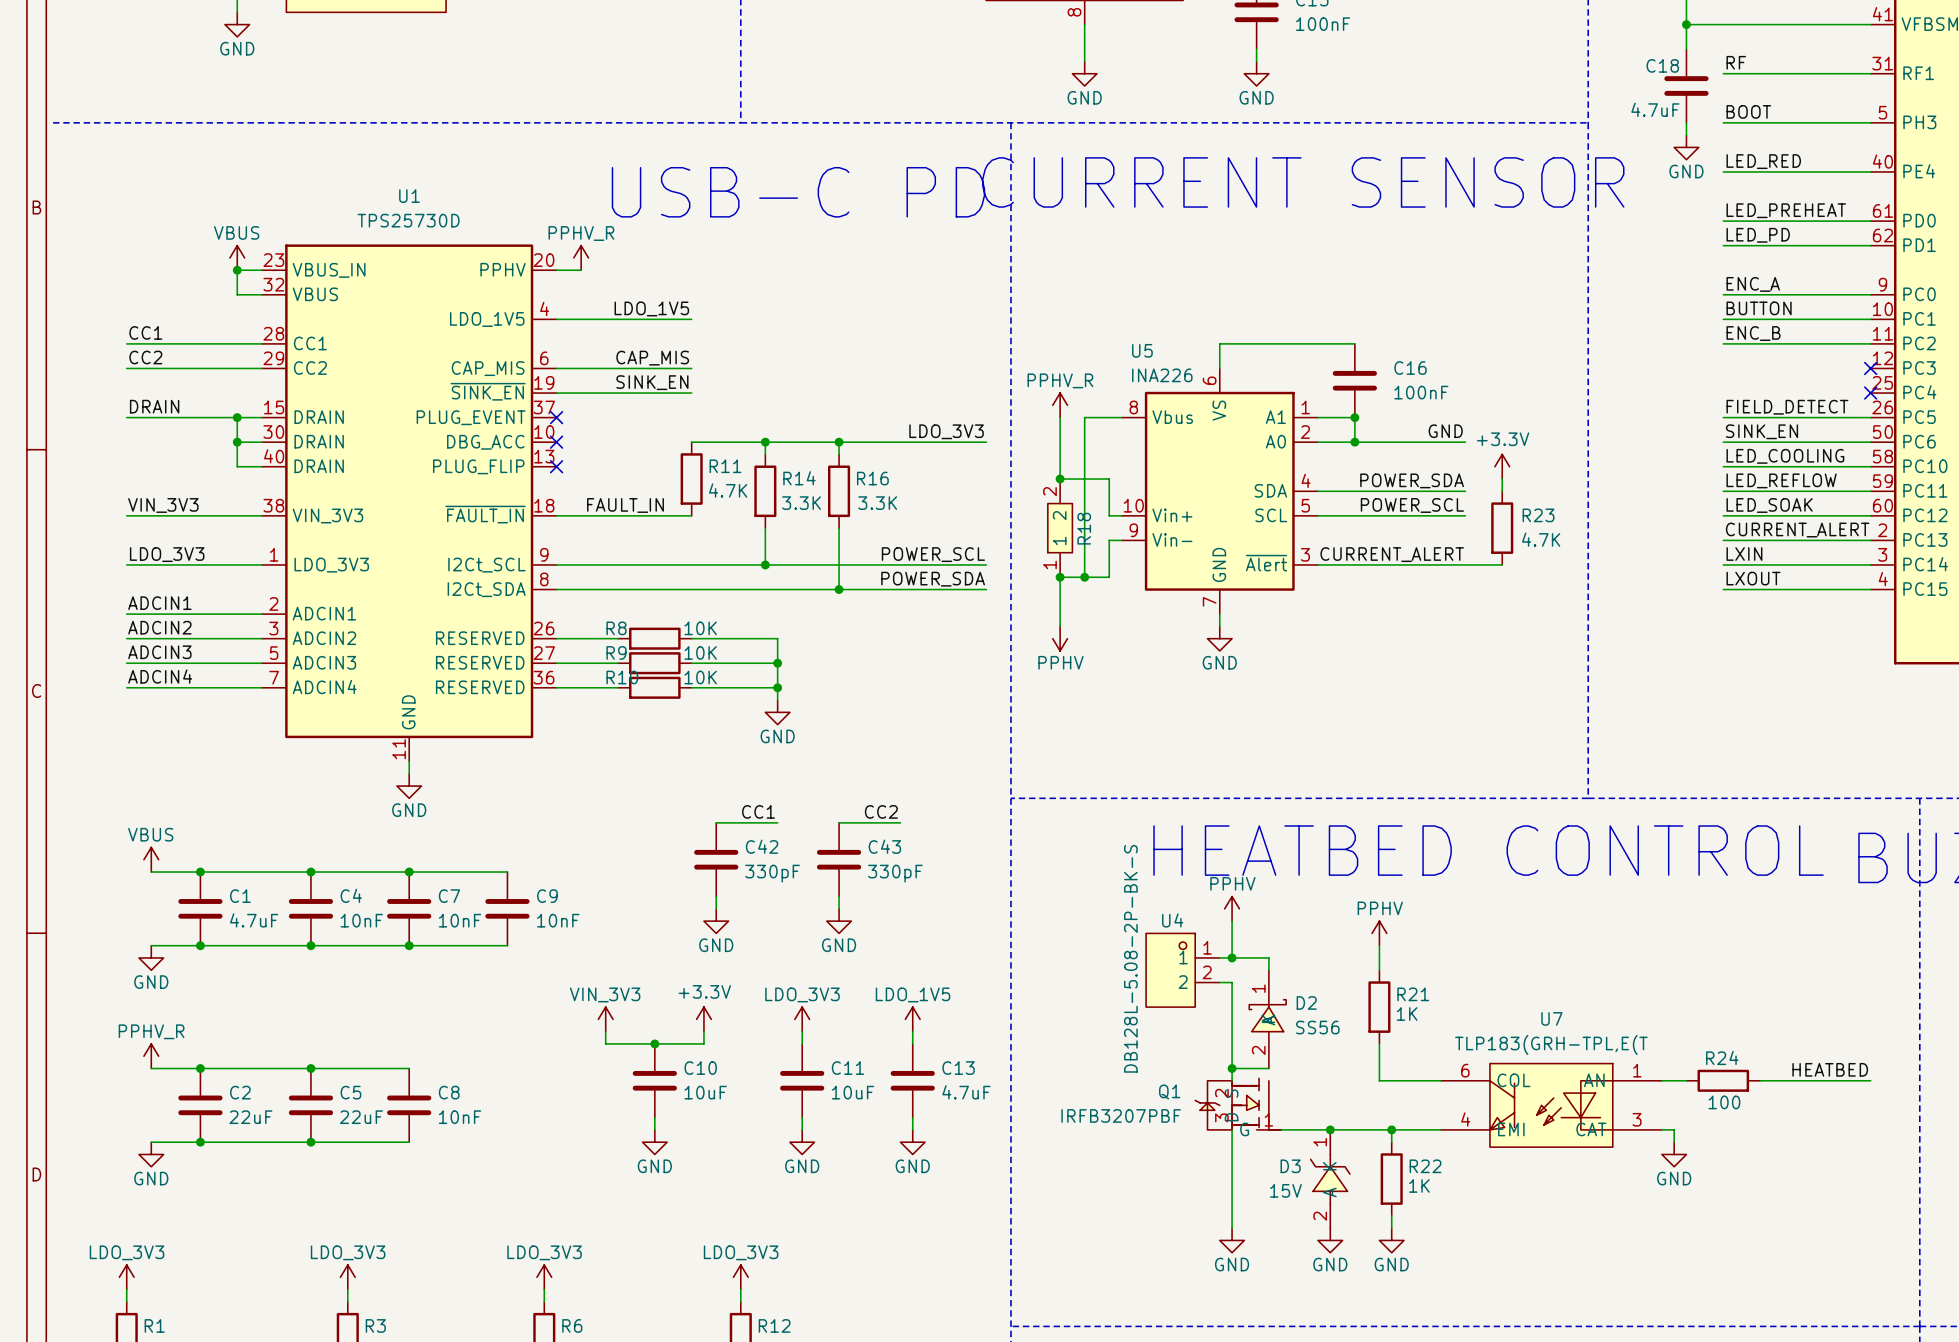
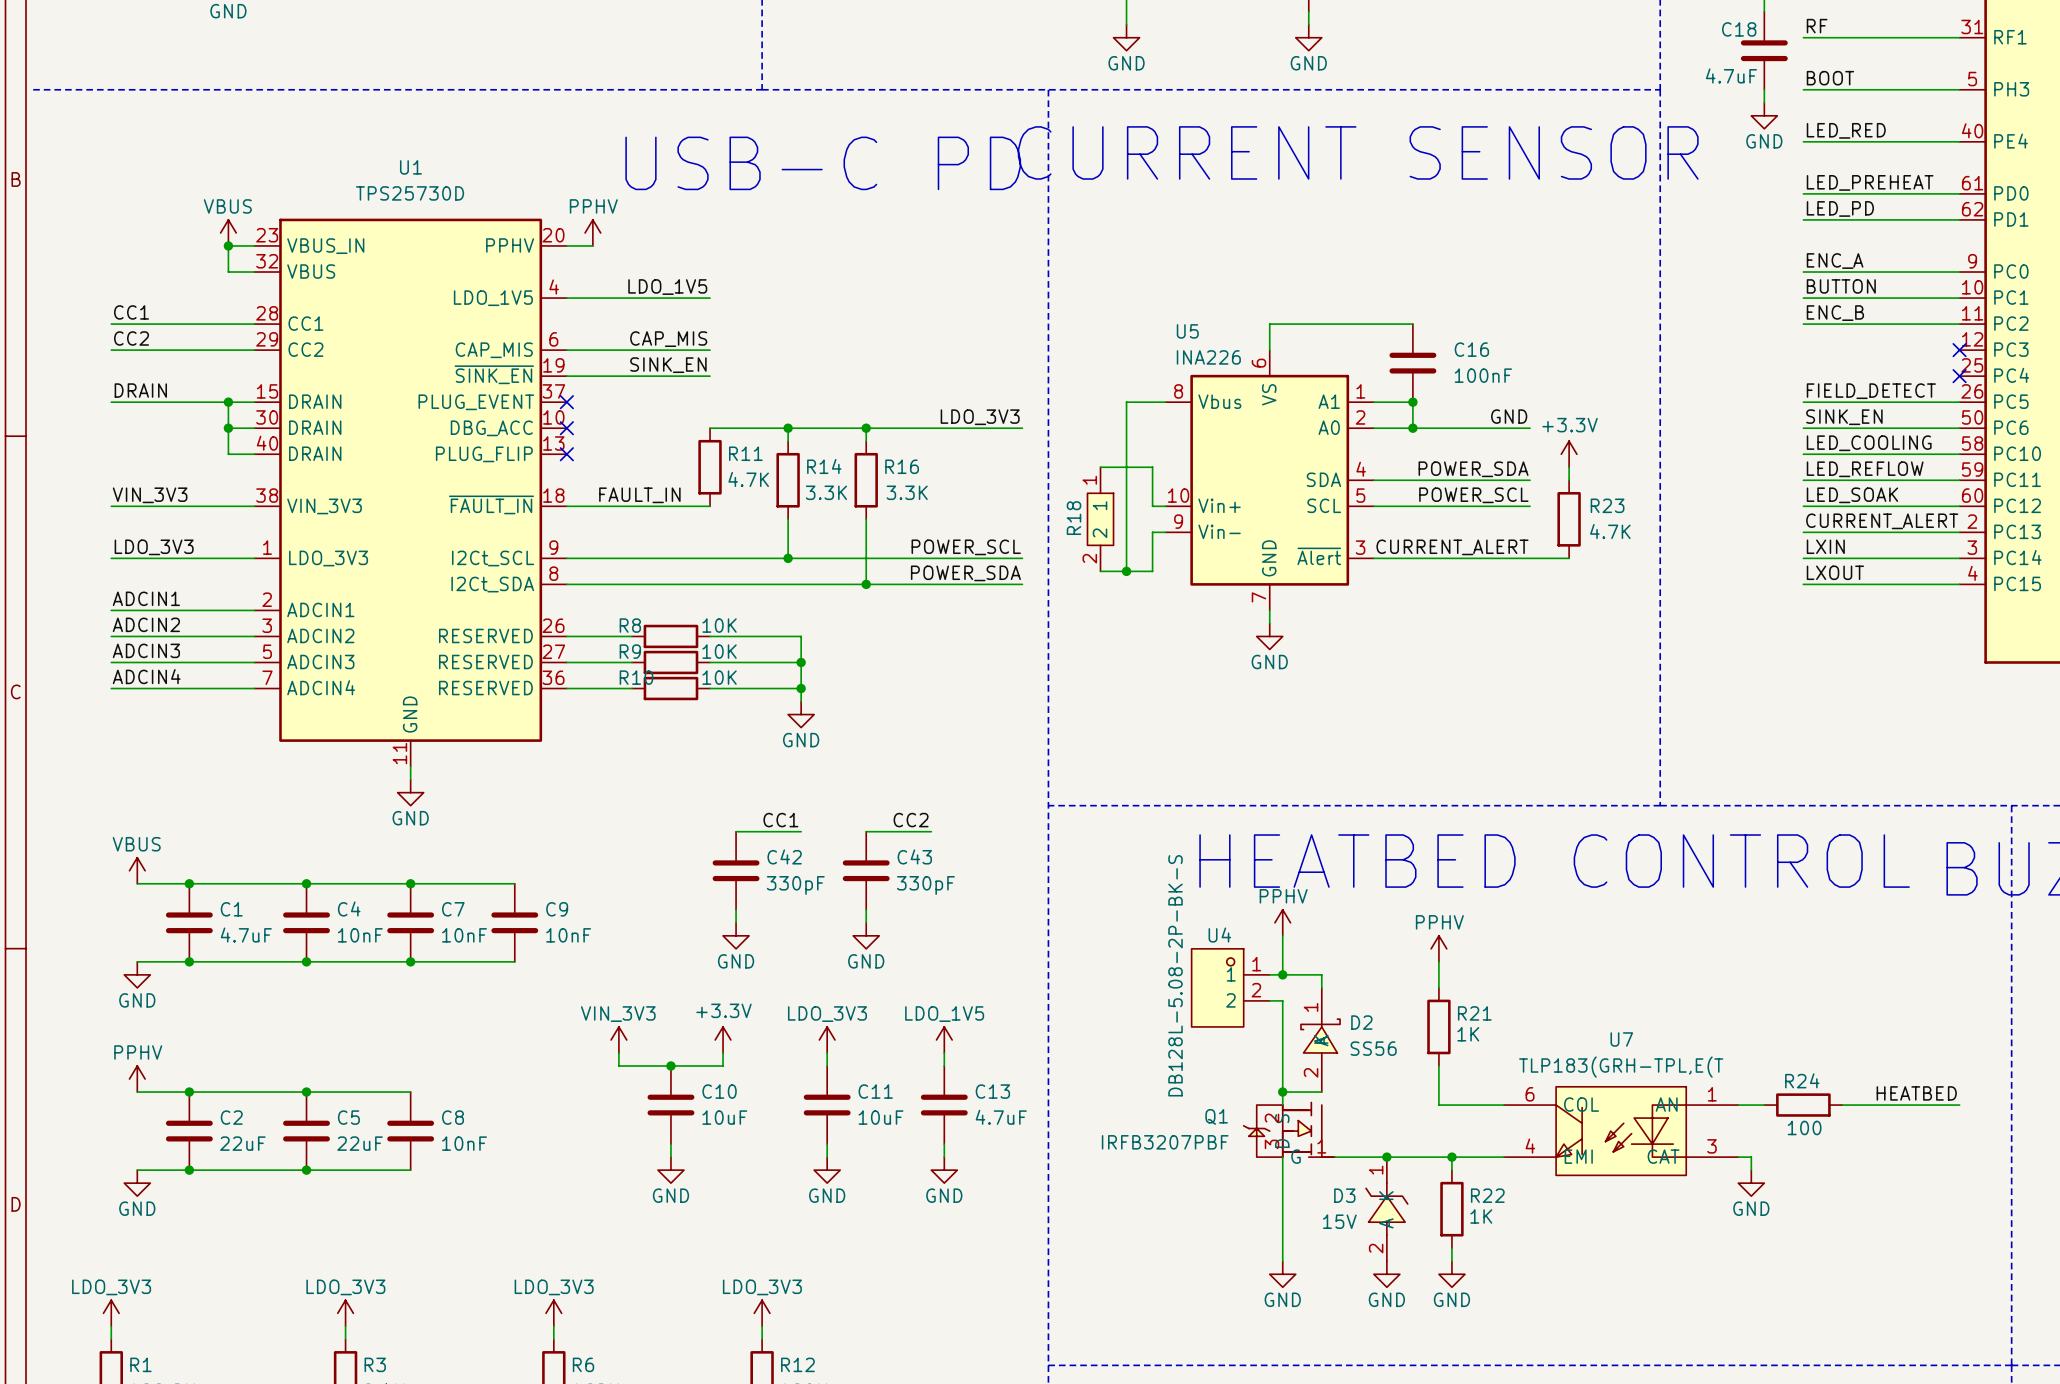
power symbol: PPHV_R (581, 257) -> PPHV (592, 232)
power symbol: PPHV_R (1060, 405) -> none
wire: (1060, 417) (1060, 479) -> none
junction: (1060, 479) -> none
R18 rotation: 0° (1060, 528) -> 180° (1100, 519)
wire: (1060, 577) (1060, 626) -> none
junction: (1060, 577) -> none
power symbol: PPHV (1060, 638) -> none
power symbol: PPHV_R (151, 1056) -> PPHV (137, 1079)

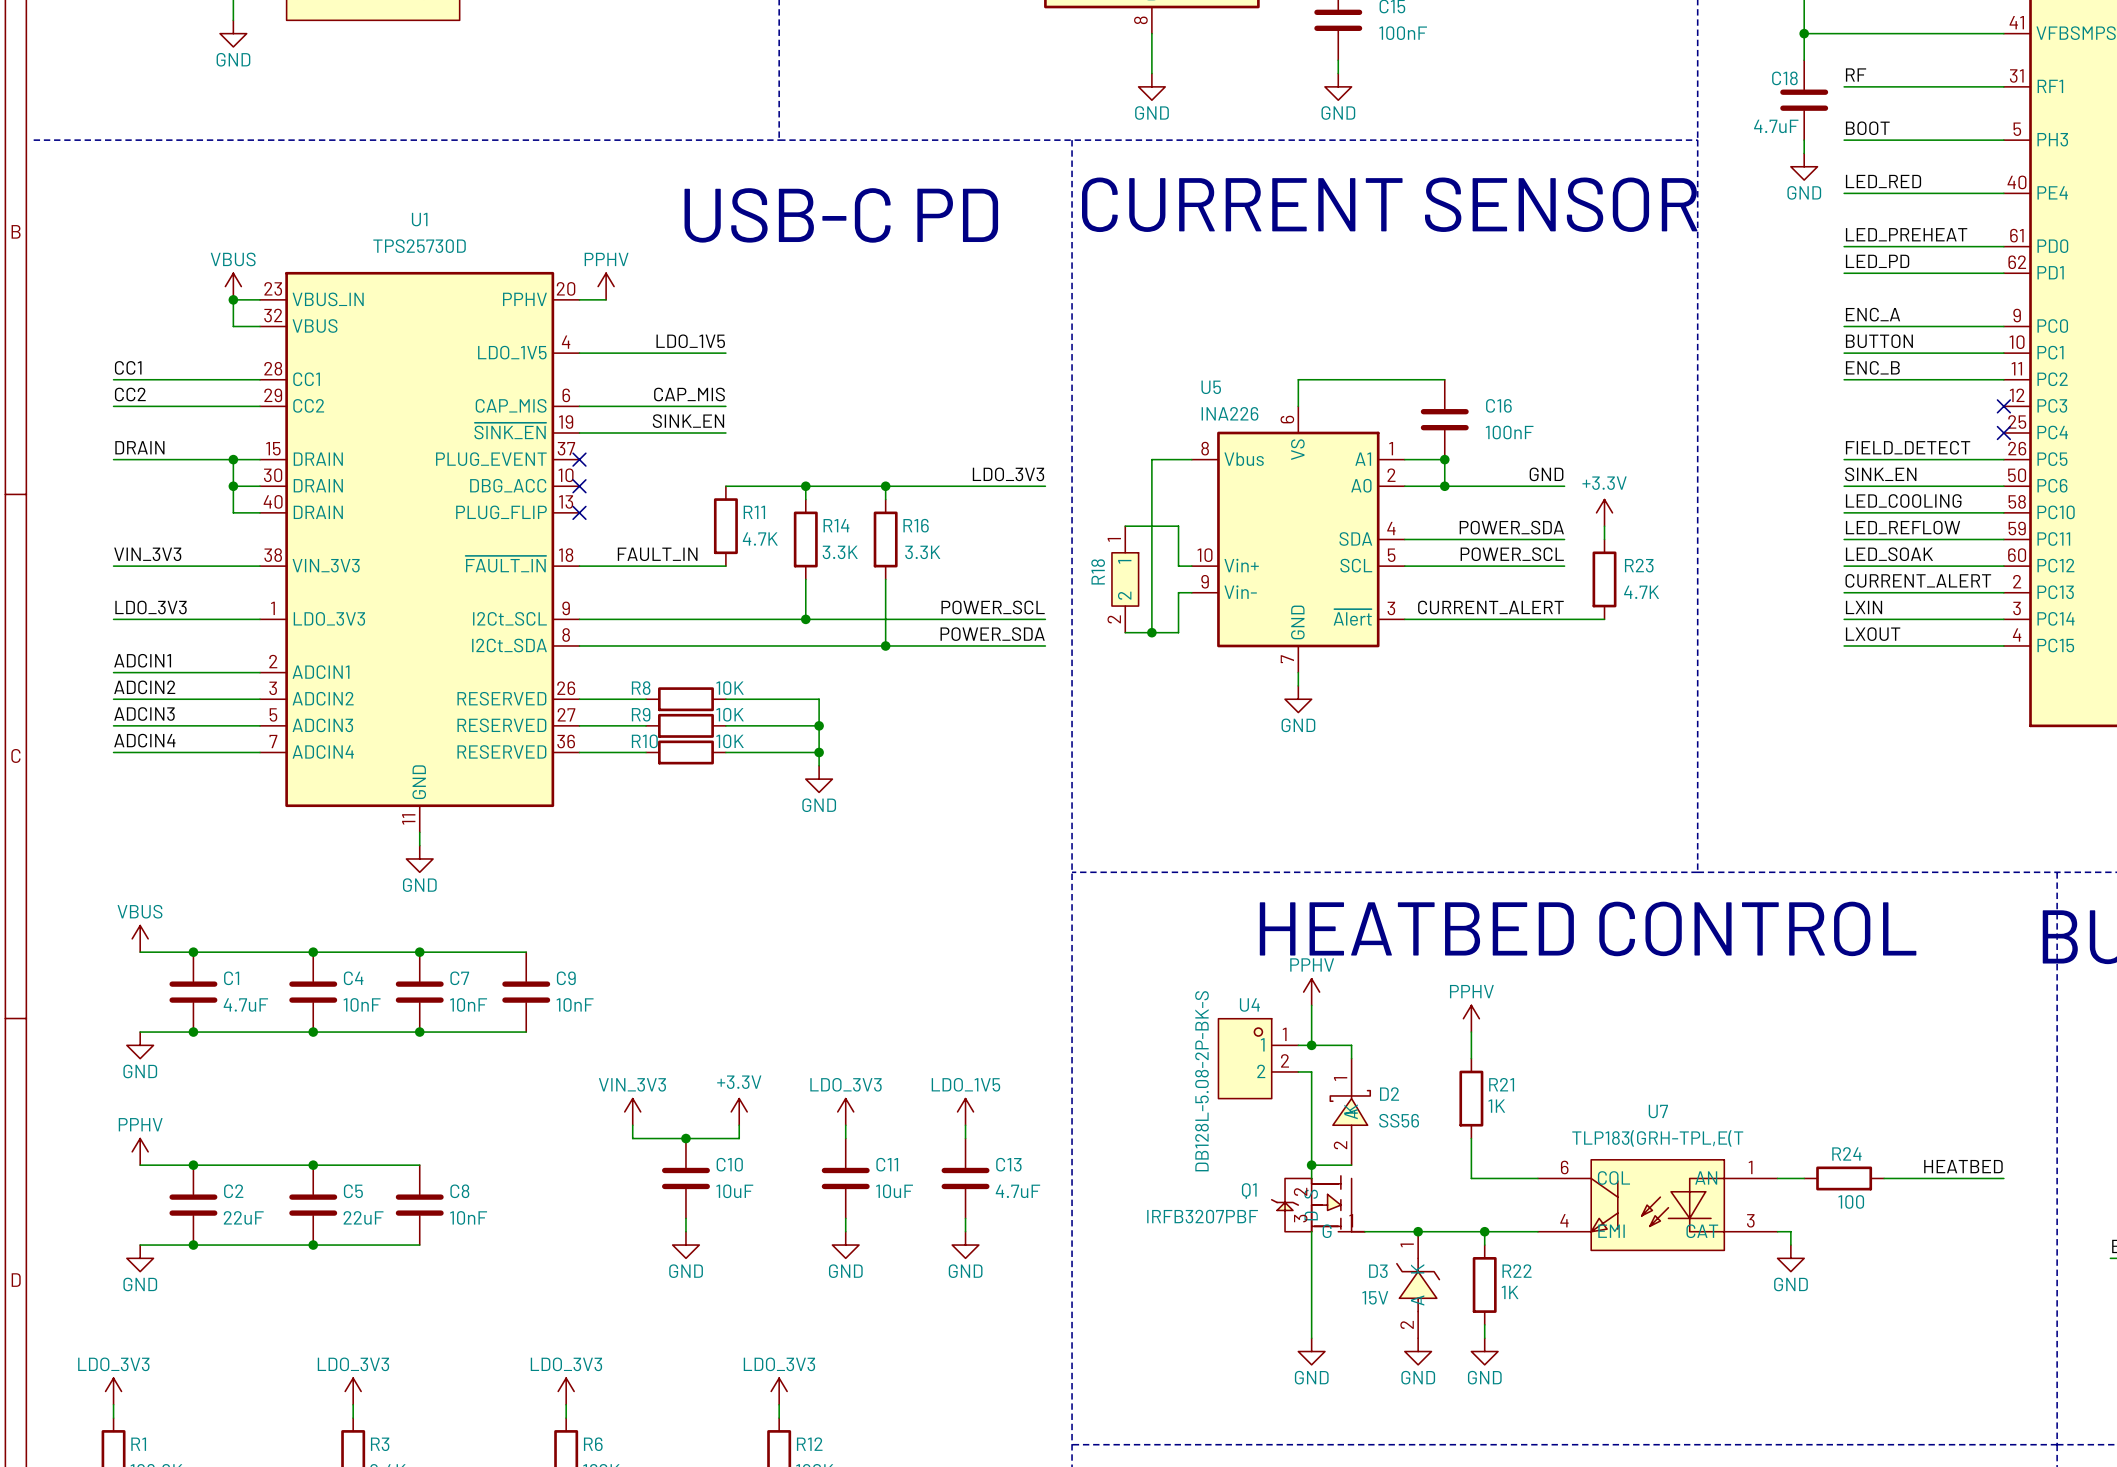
label: CC1 (780, 820) -> none
label: CC2 (911, 820) -> none
wire: (736, 831) (801, 831) -> none
wire: (866, 831) (931, 831) -> none
C42: 330pF (736, 870) -> none
C43: 330pF (866, 870) -> none
wire: (736, 909) (736, 922) -> none
wire: (866, 909) (866, 922) -> none
power symbol: GND (736, 935) -> none
power symbol: GND (866, 935) -> none

